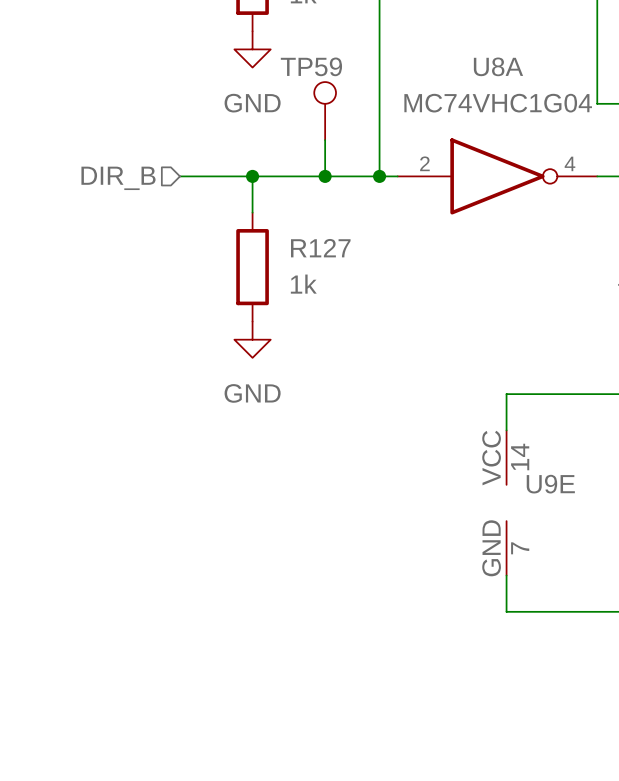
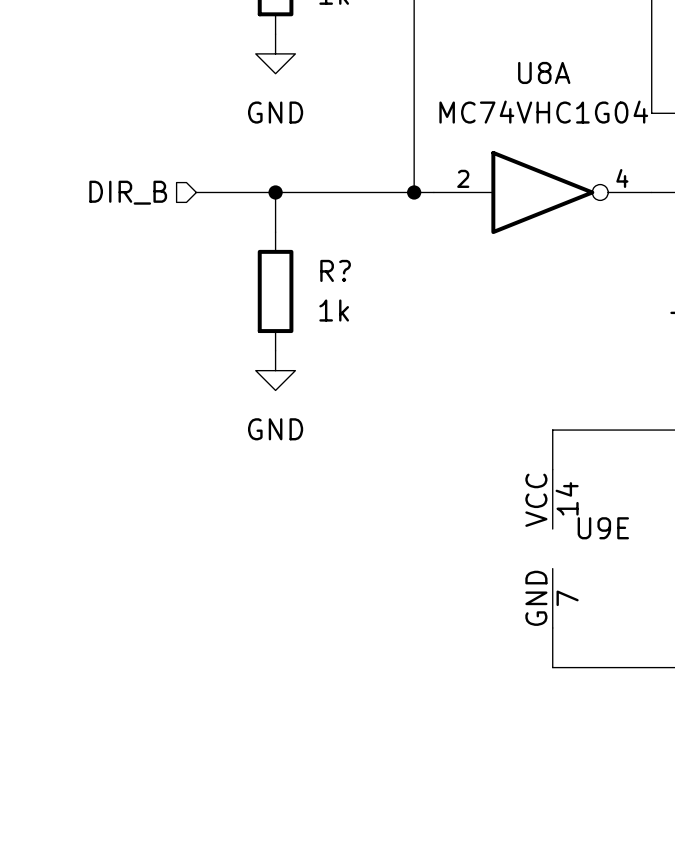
TP59: (325, 111) -> none
wire: (325, 140) (325, 176) -> none
junction: (325, 176) -> none
R127 name: R127 (320, 248) -> R? (335, 270)

